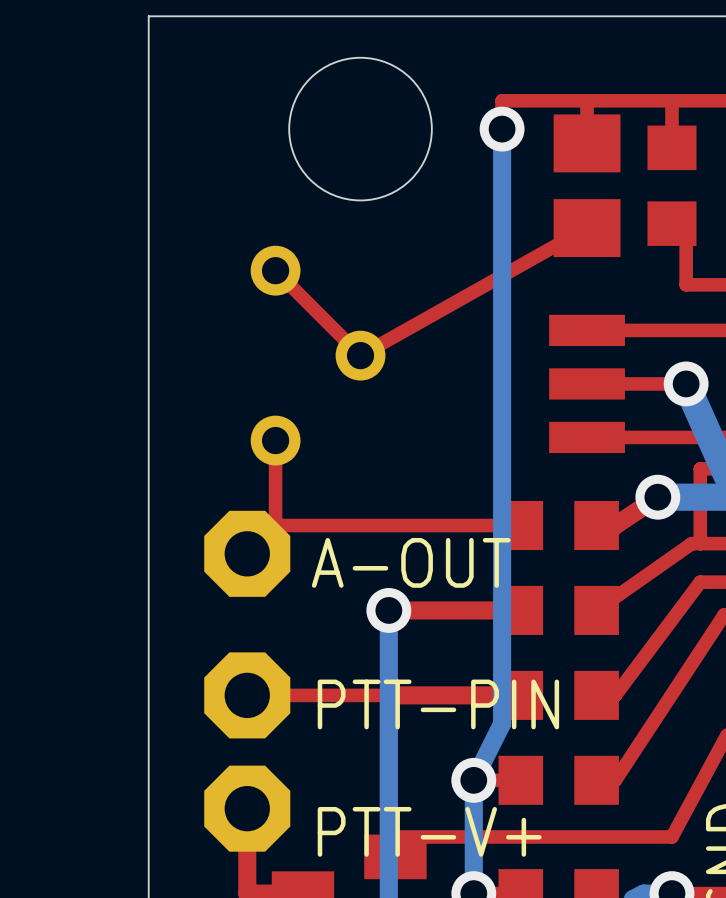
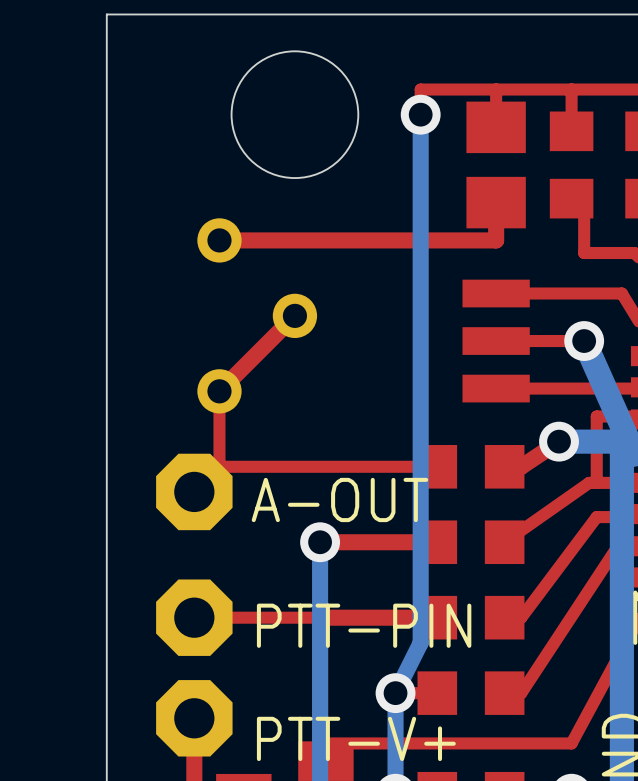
top track: (587, 228) (360, 355) (275, 270) -> (496, 202) (496, 240) (219, 240)
top track: none -> (294, 315) (219, 391)

